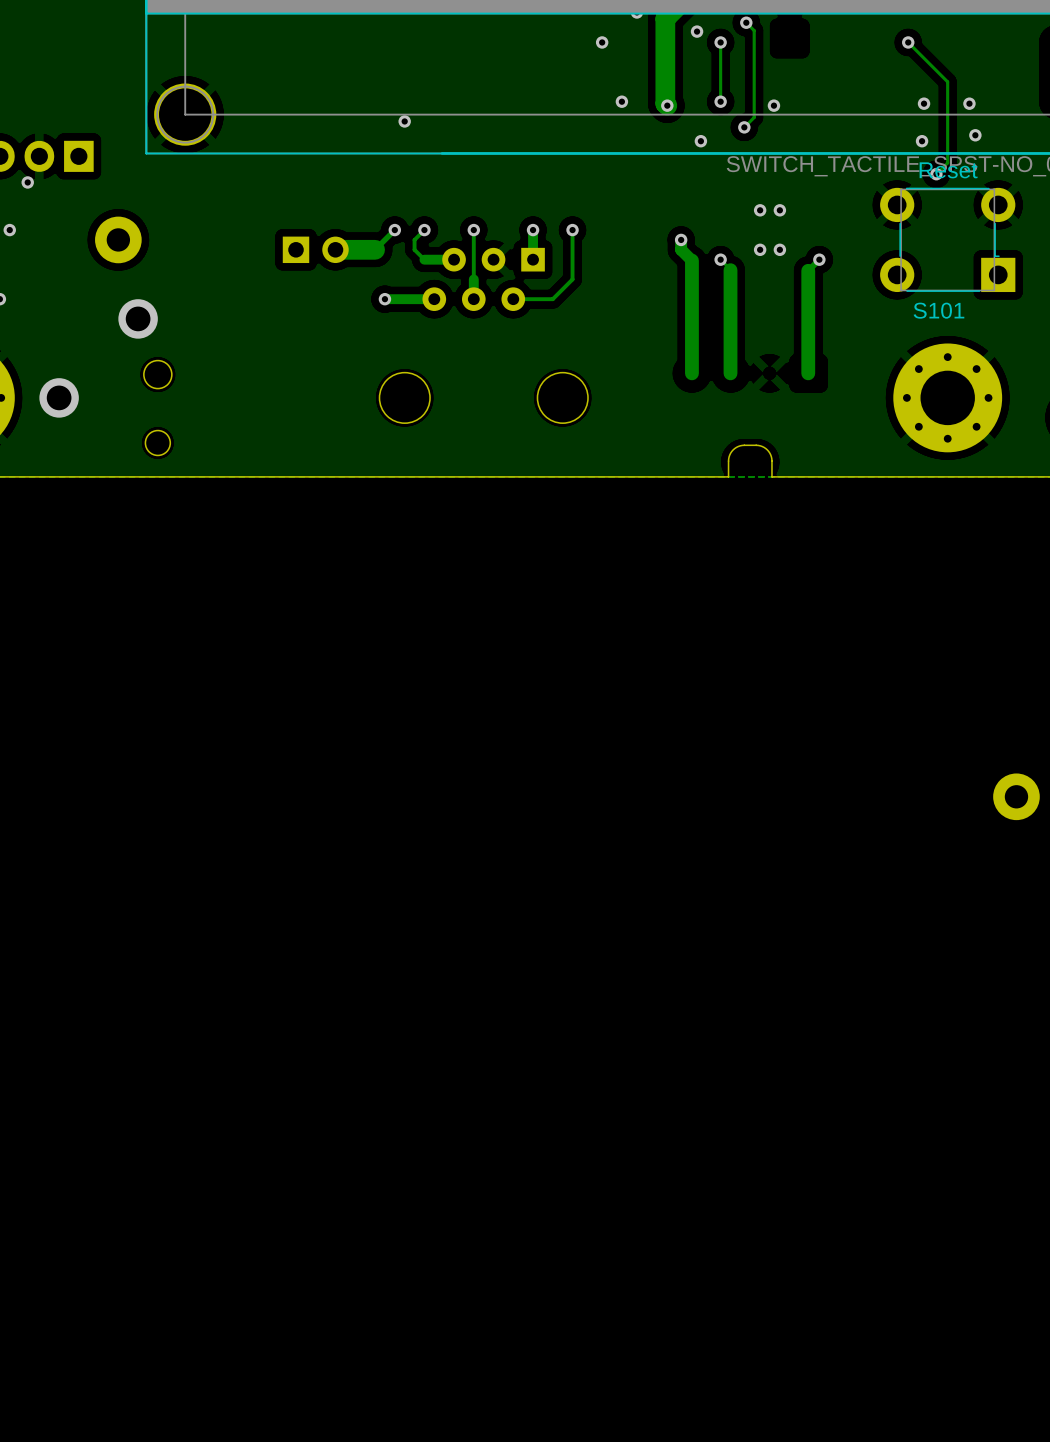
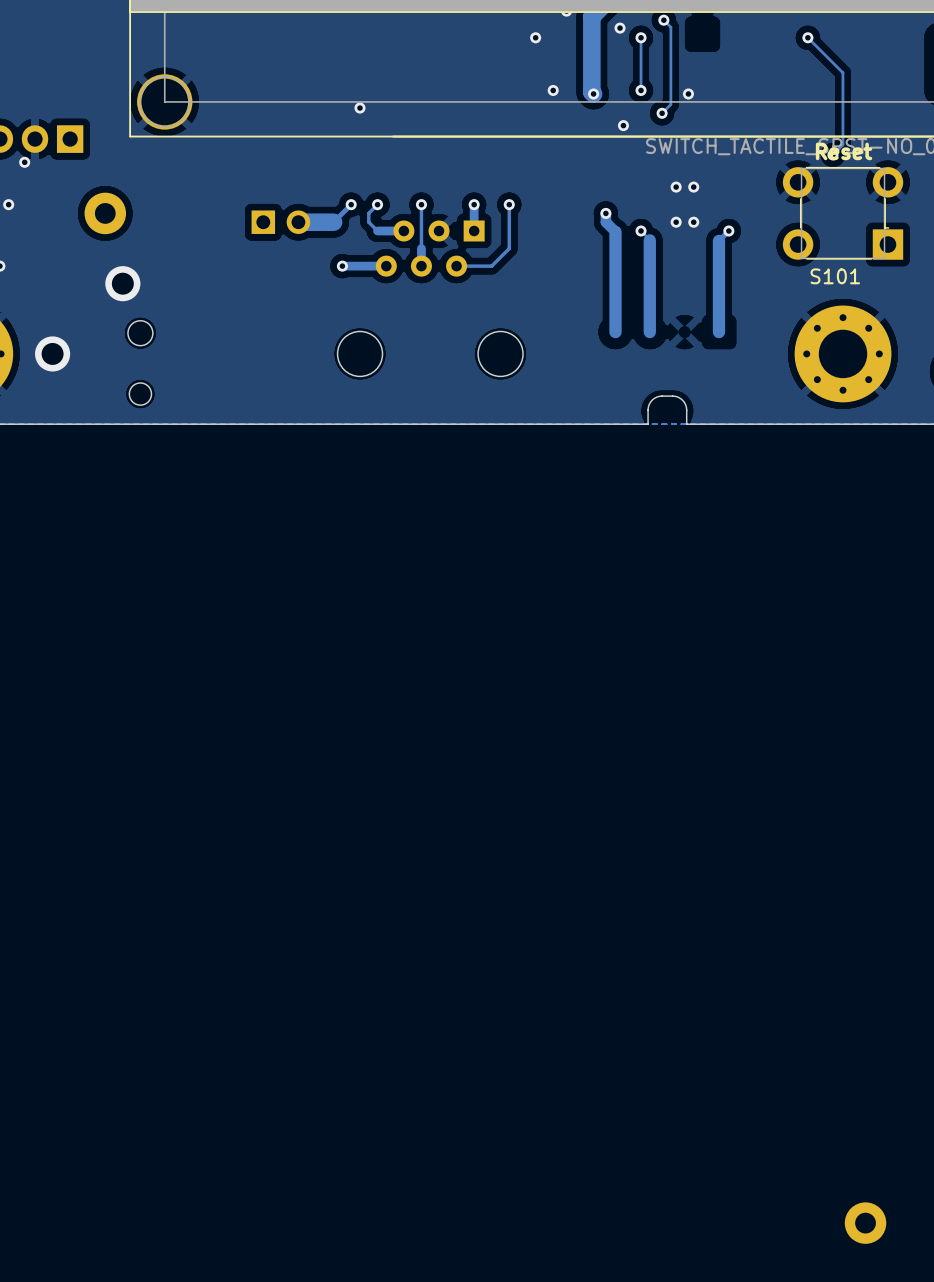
via: (924, 103) -> none
via: (969, 103) -> none
via: (975, 135) -> none
via: (922, 141) -> none
part: (1016, 796) -> none
part: none -> (865, 1223)

